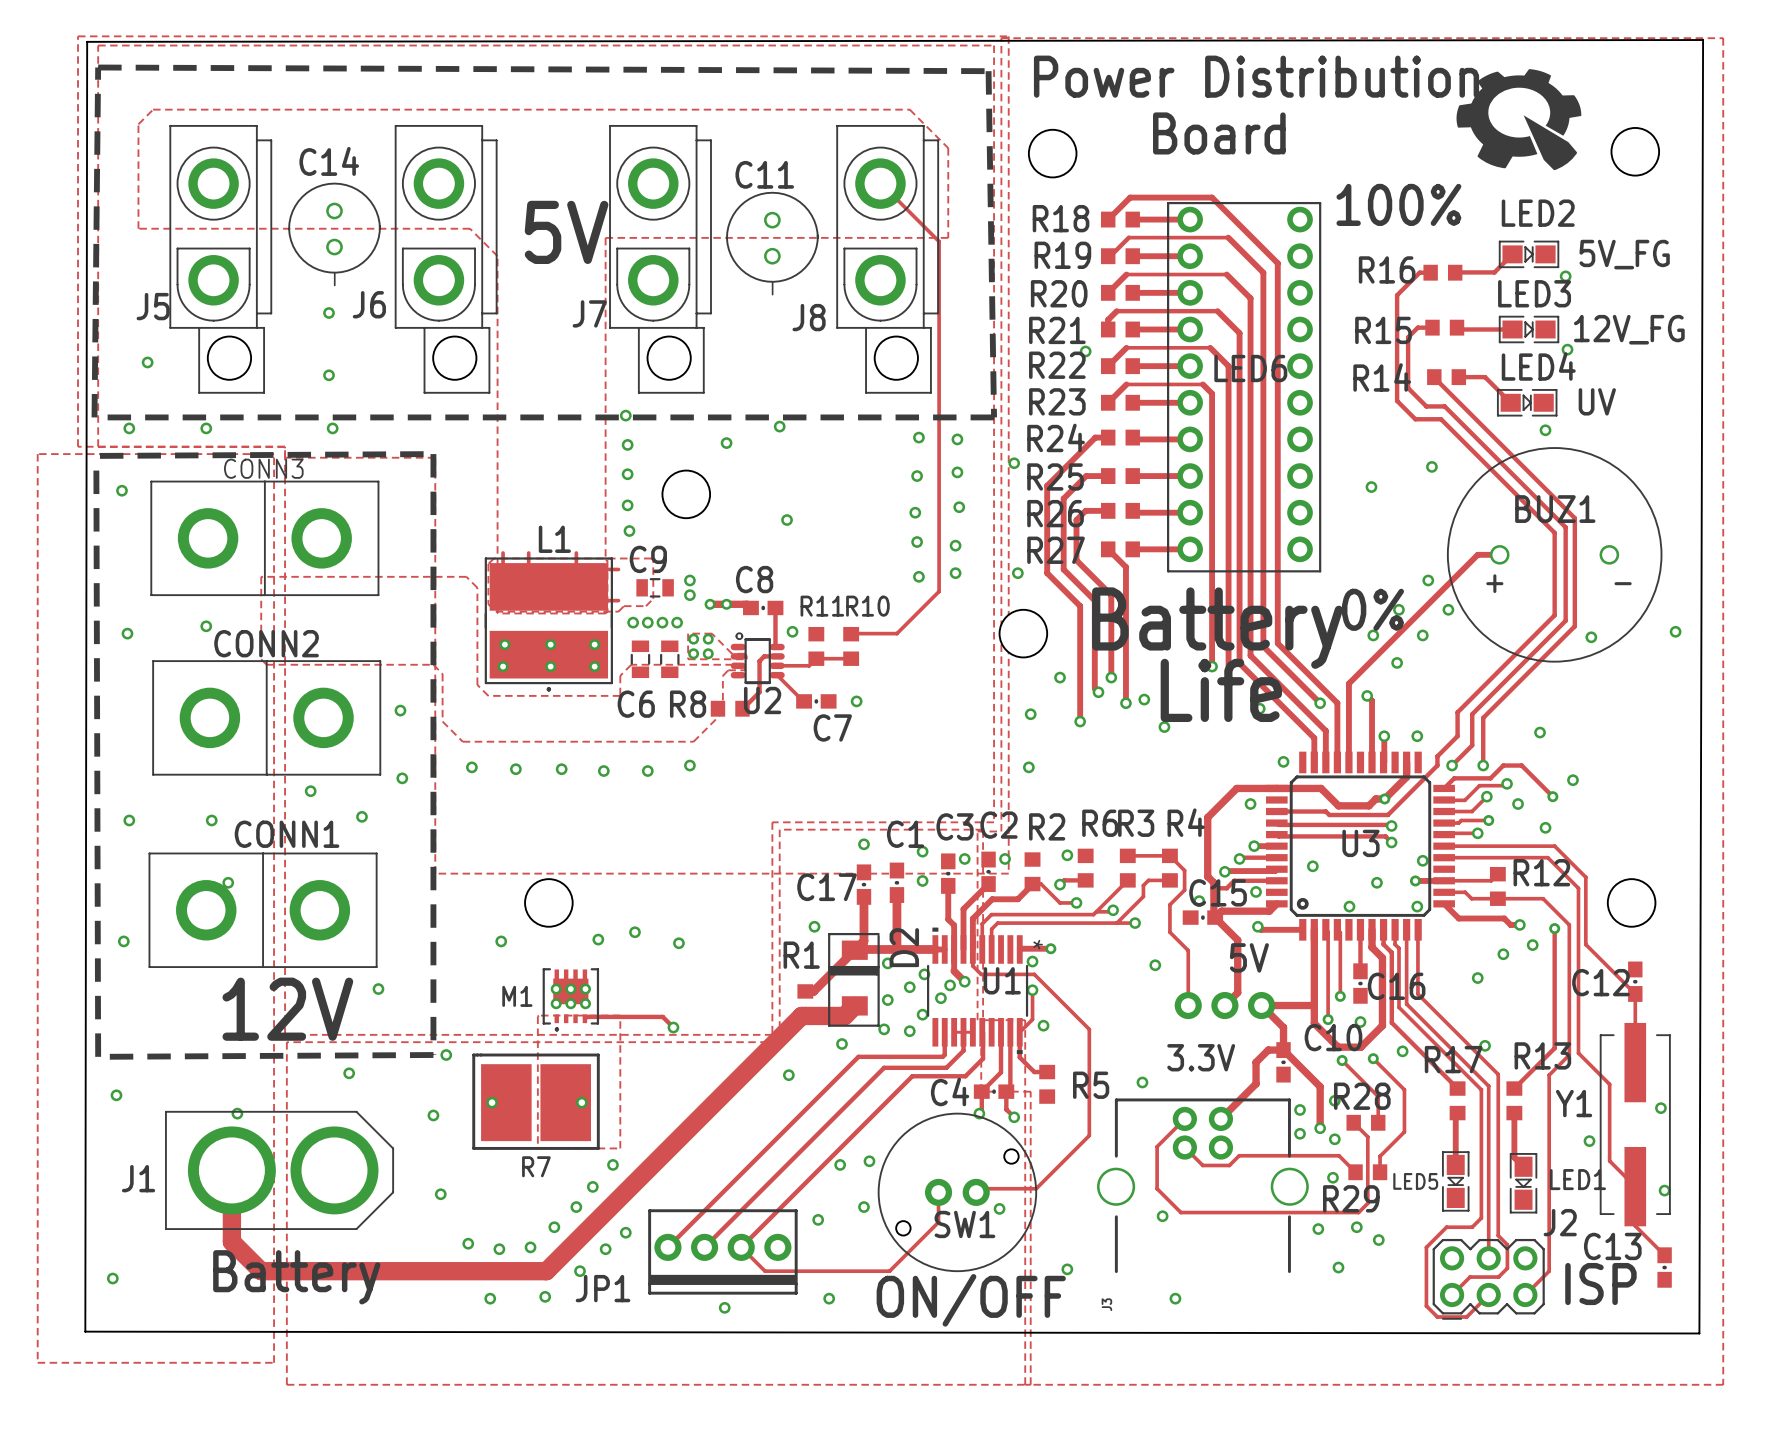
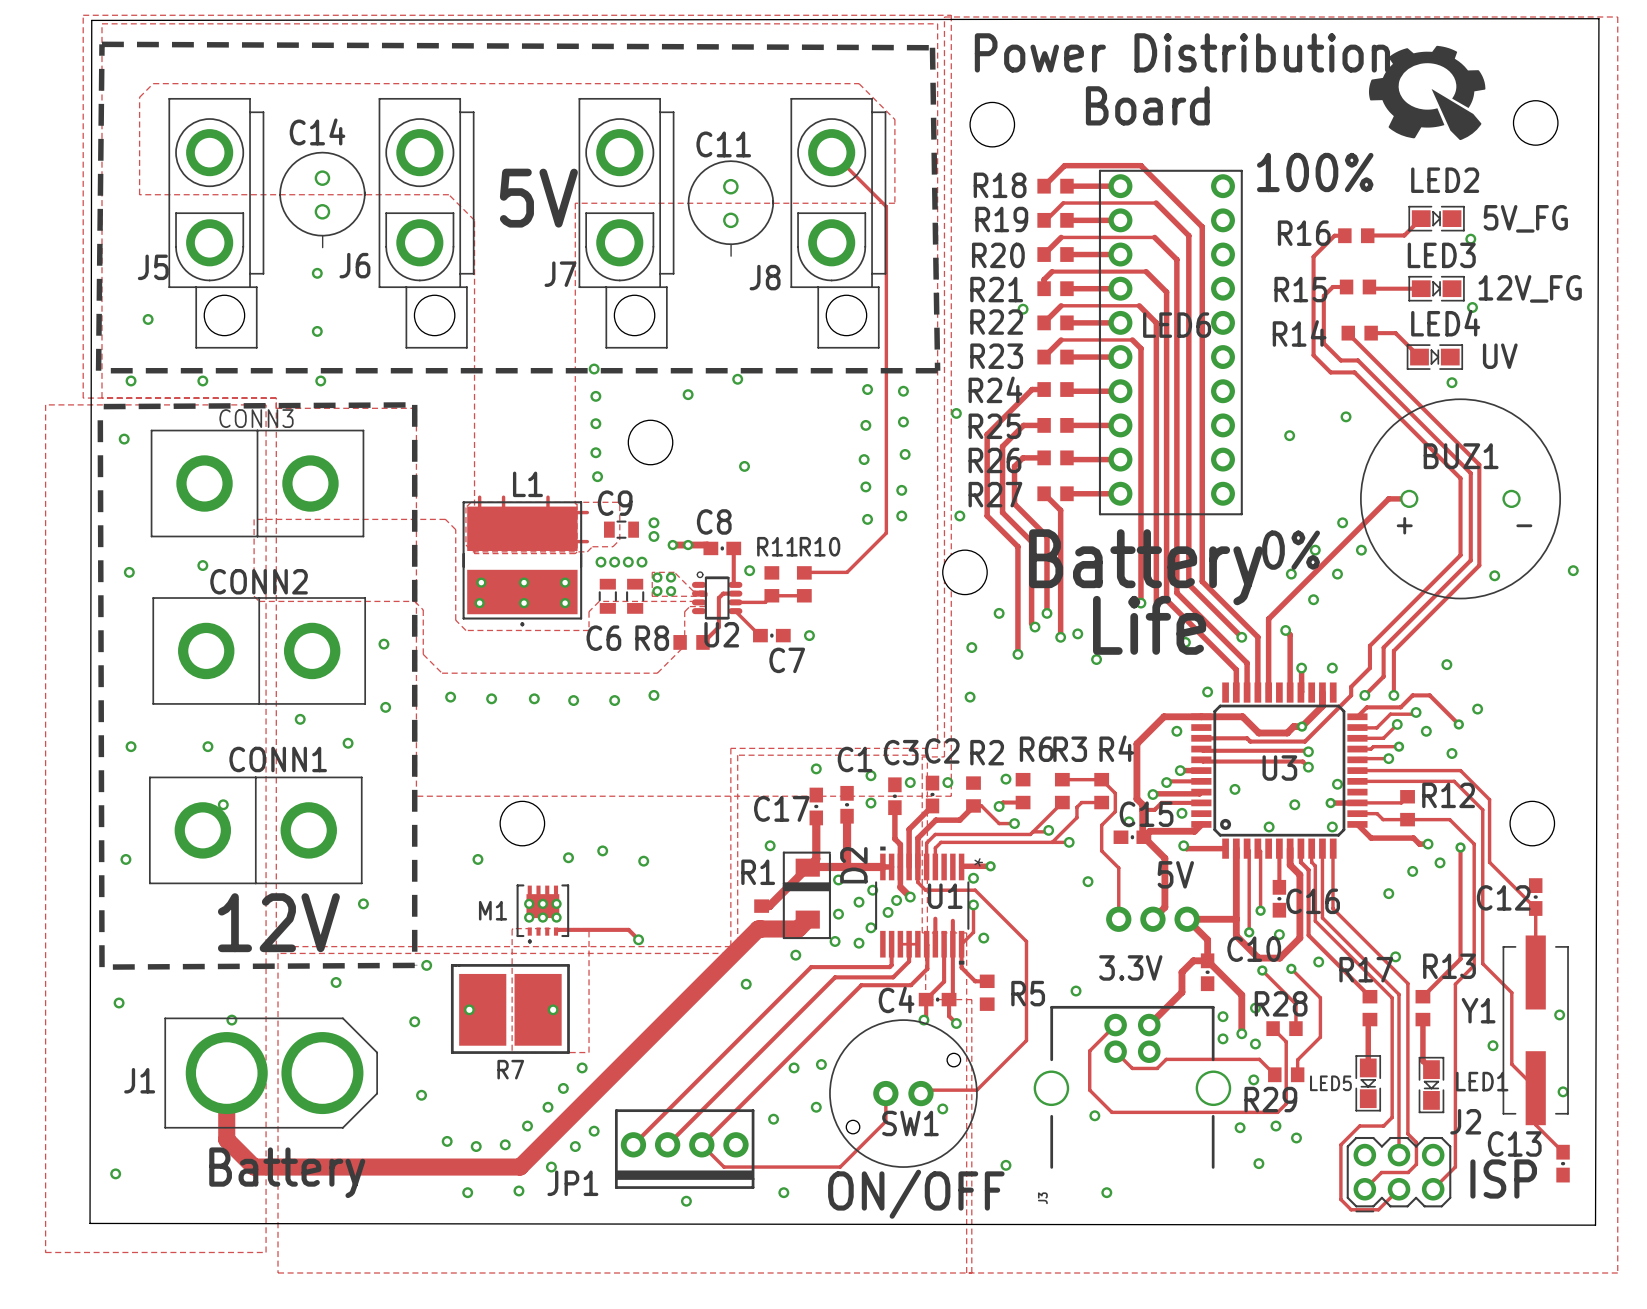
track: none -> (935, 918) (935, 944)
track: none -> (952, 920) (952, 944)

